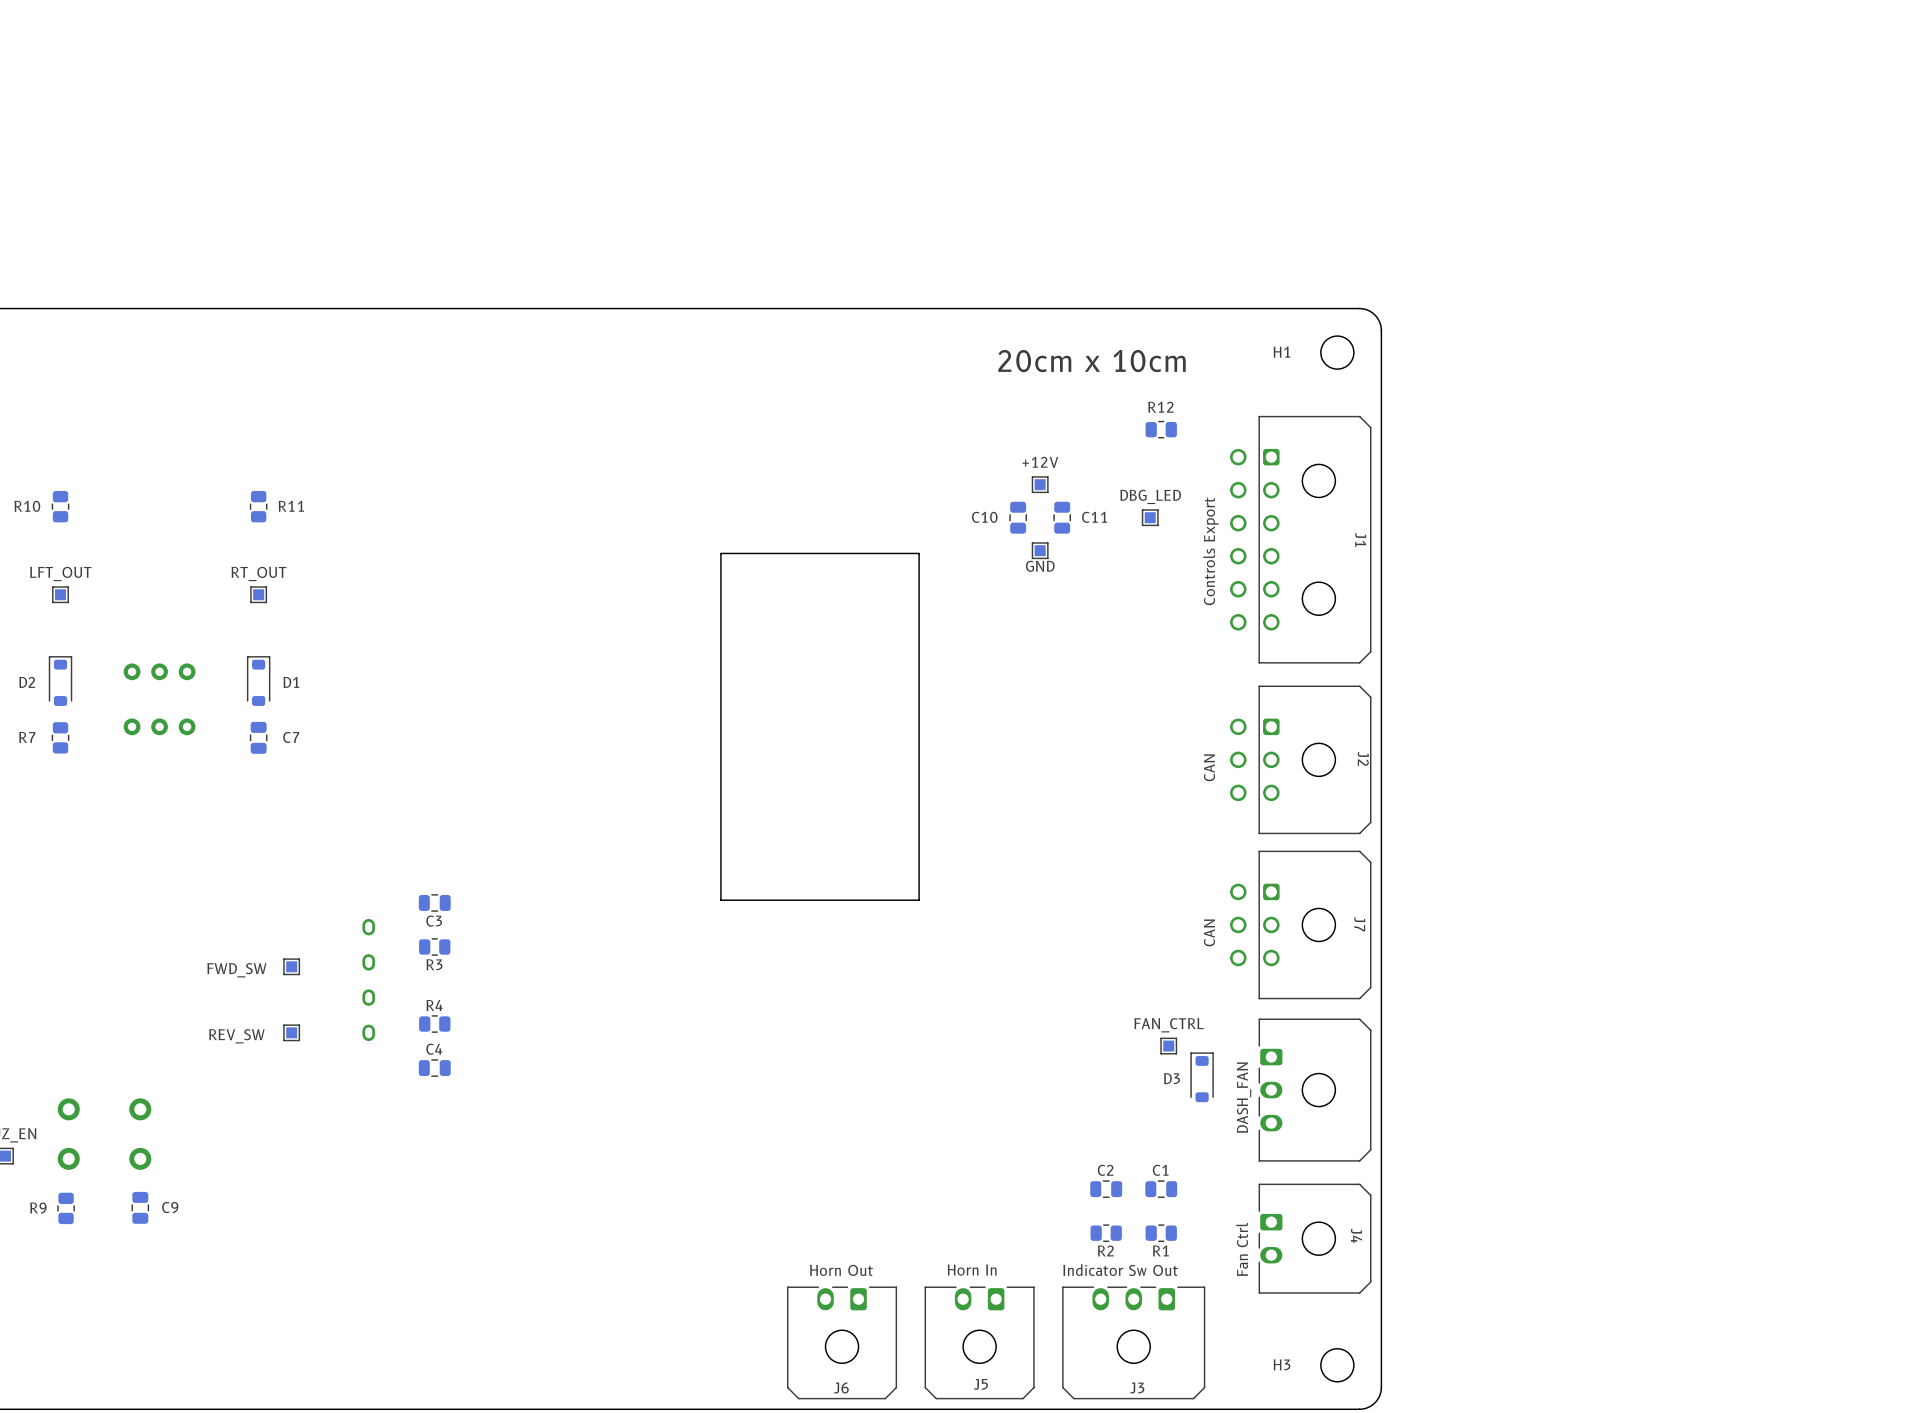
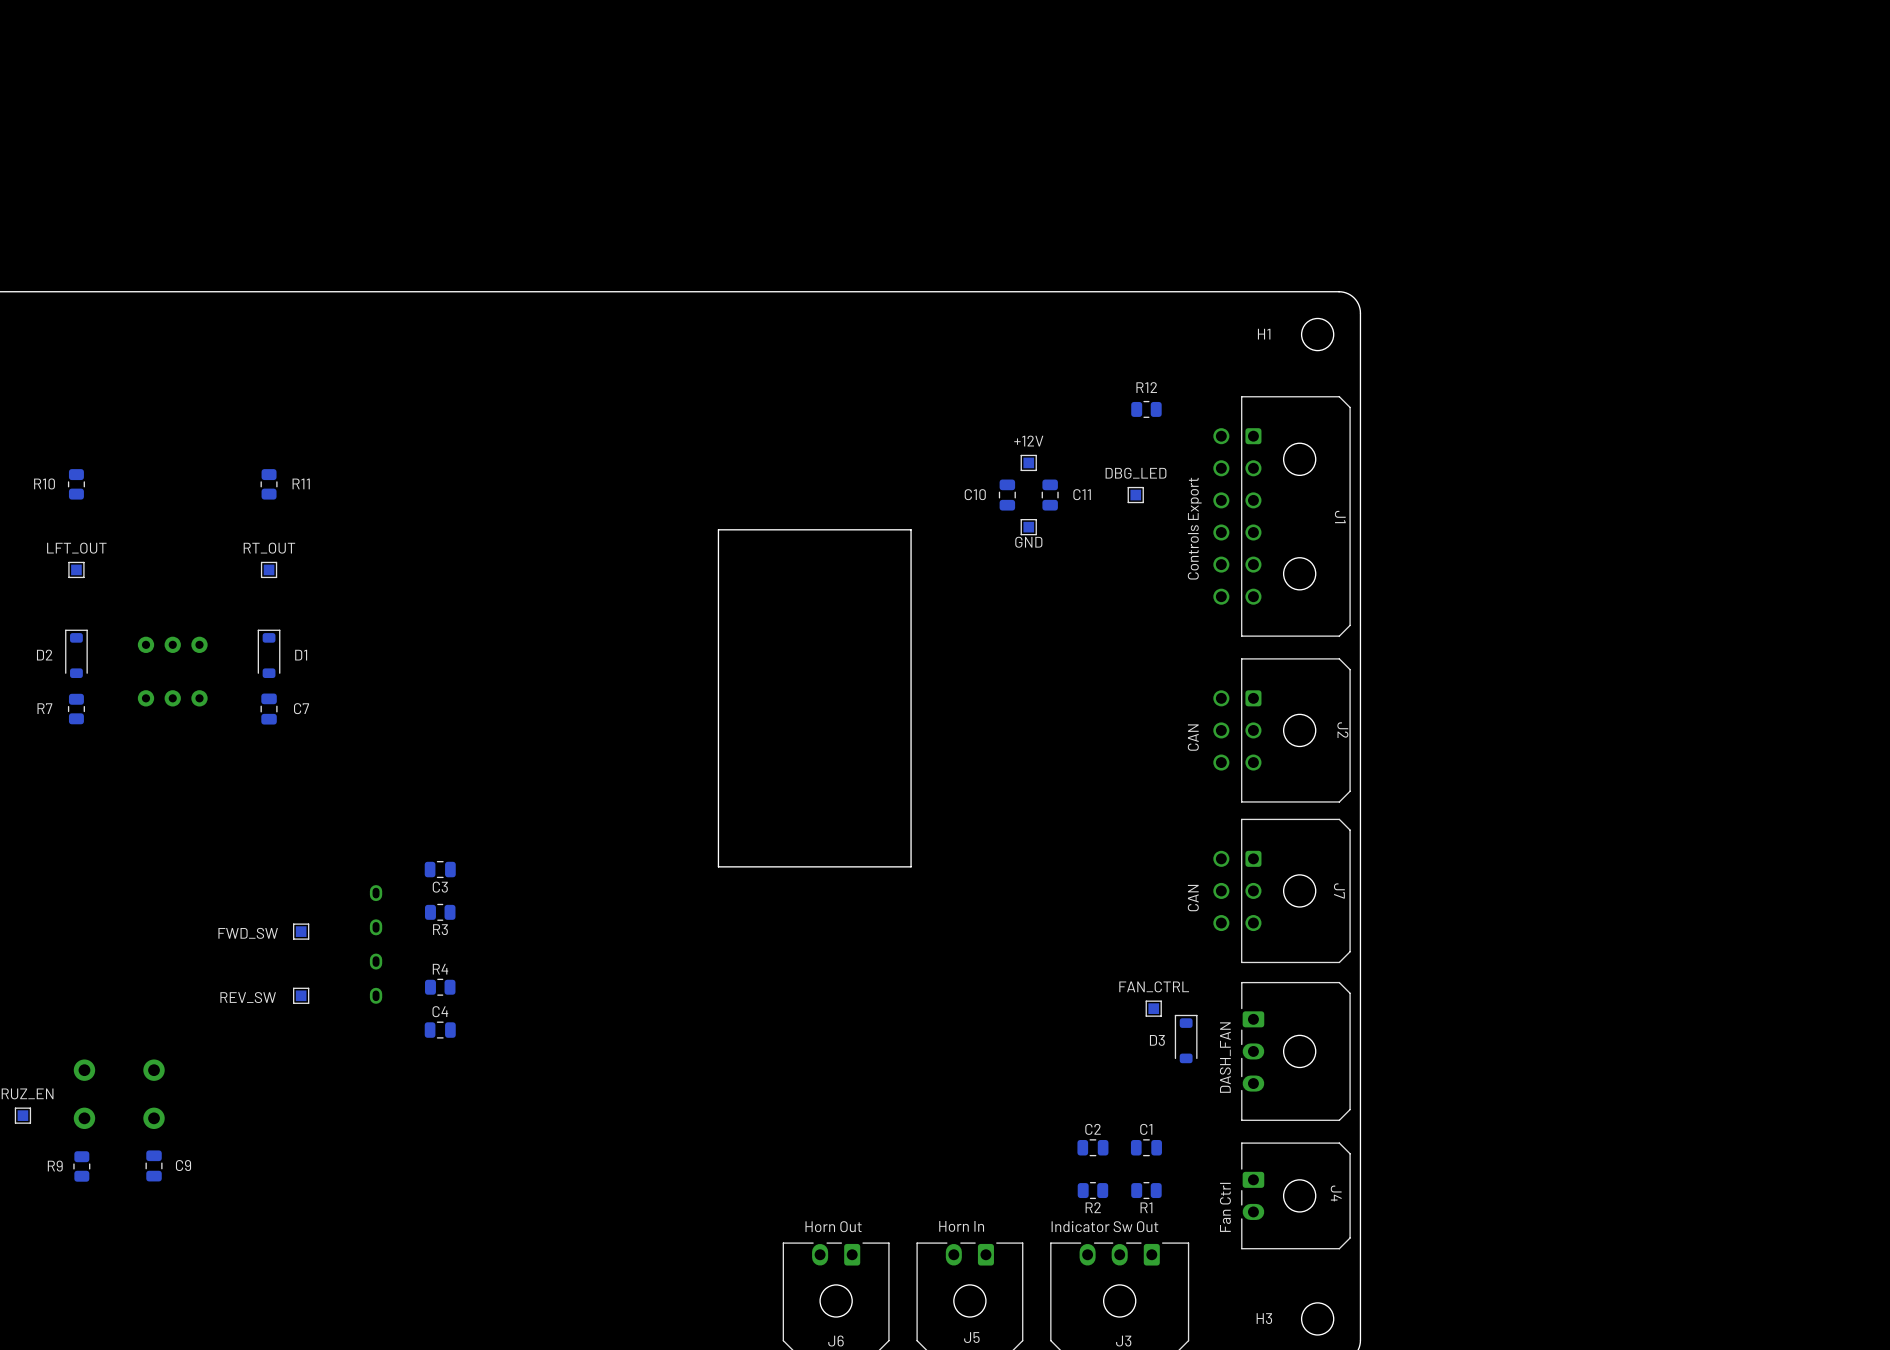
text: 20cm x 10cm (1092, 361) -> none

